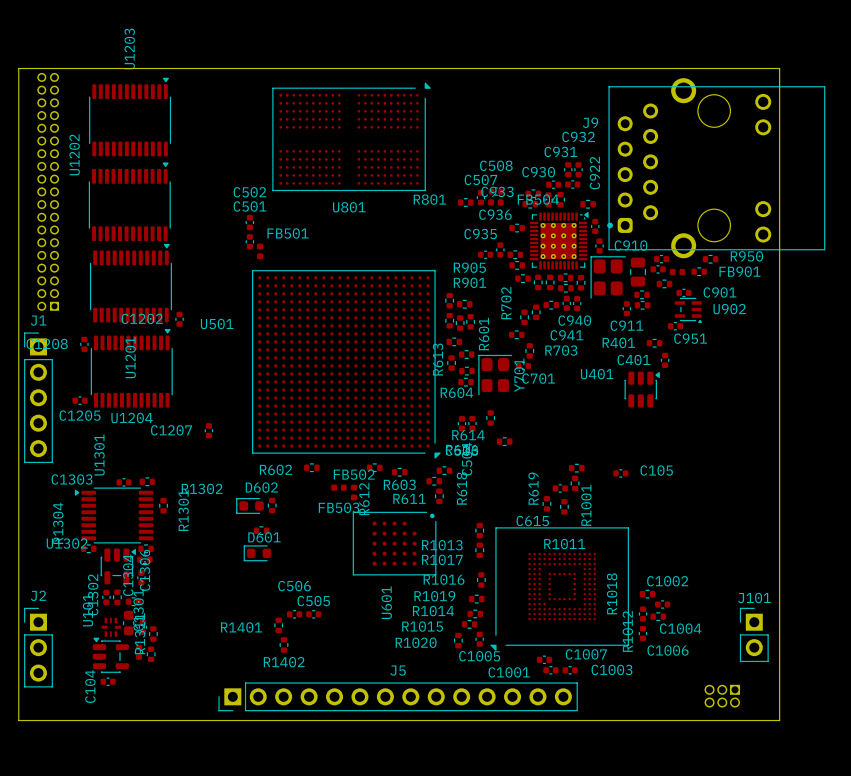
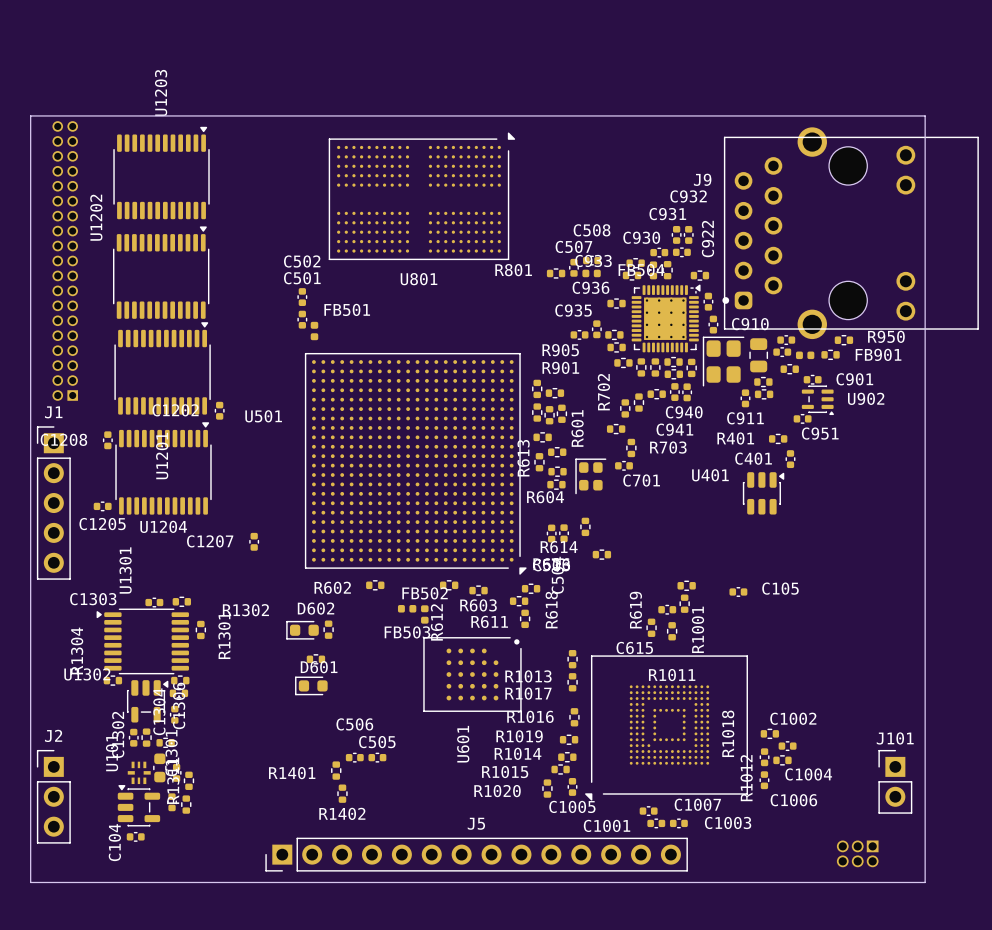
Y701: (495, 375) -> none
part: none -> (590, 476)

